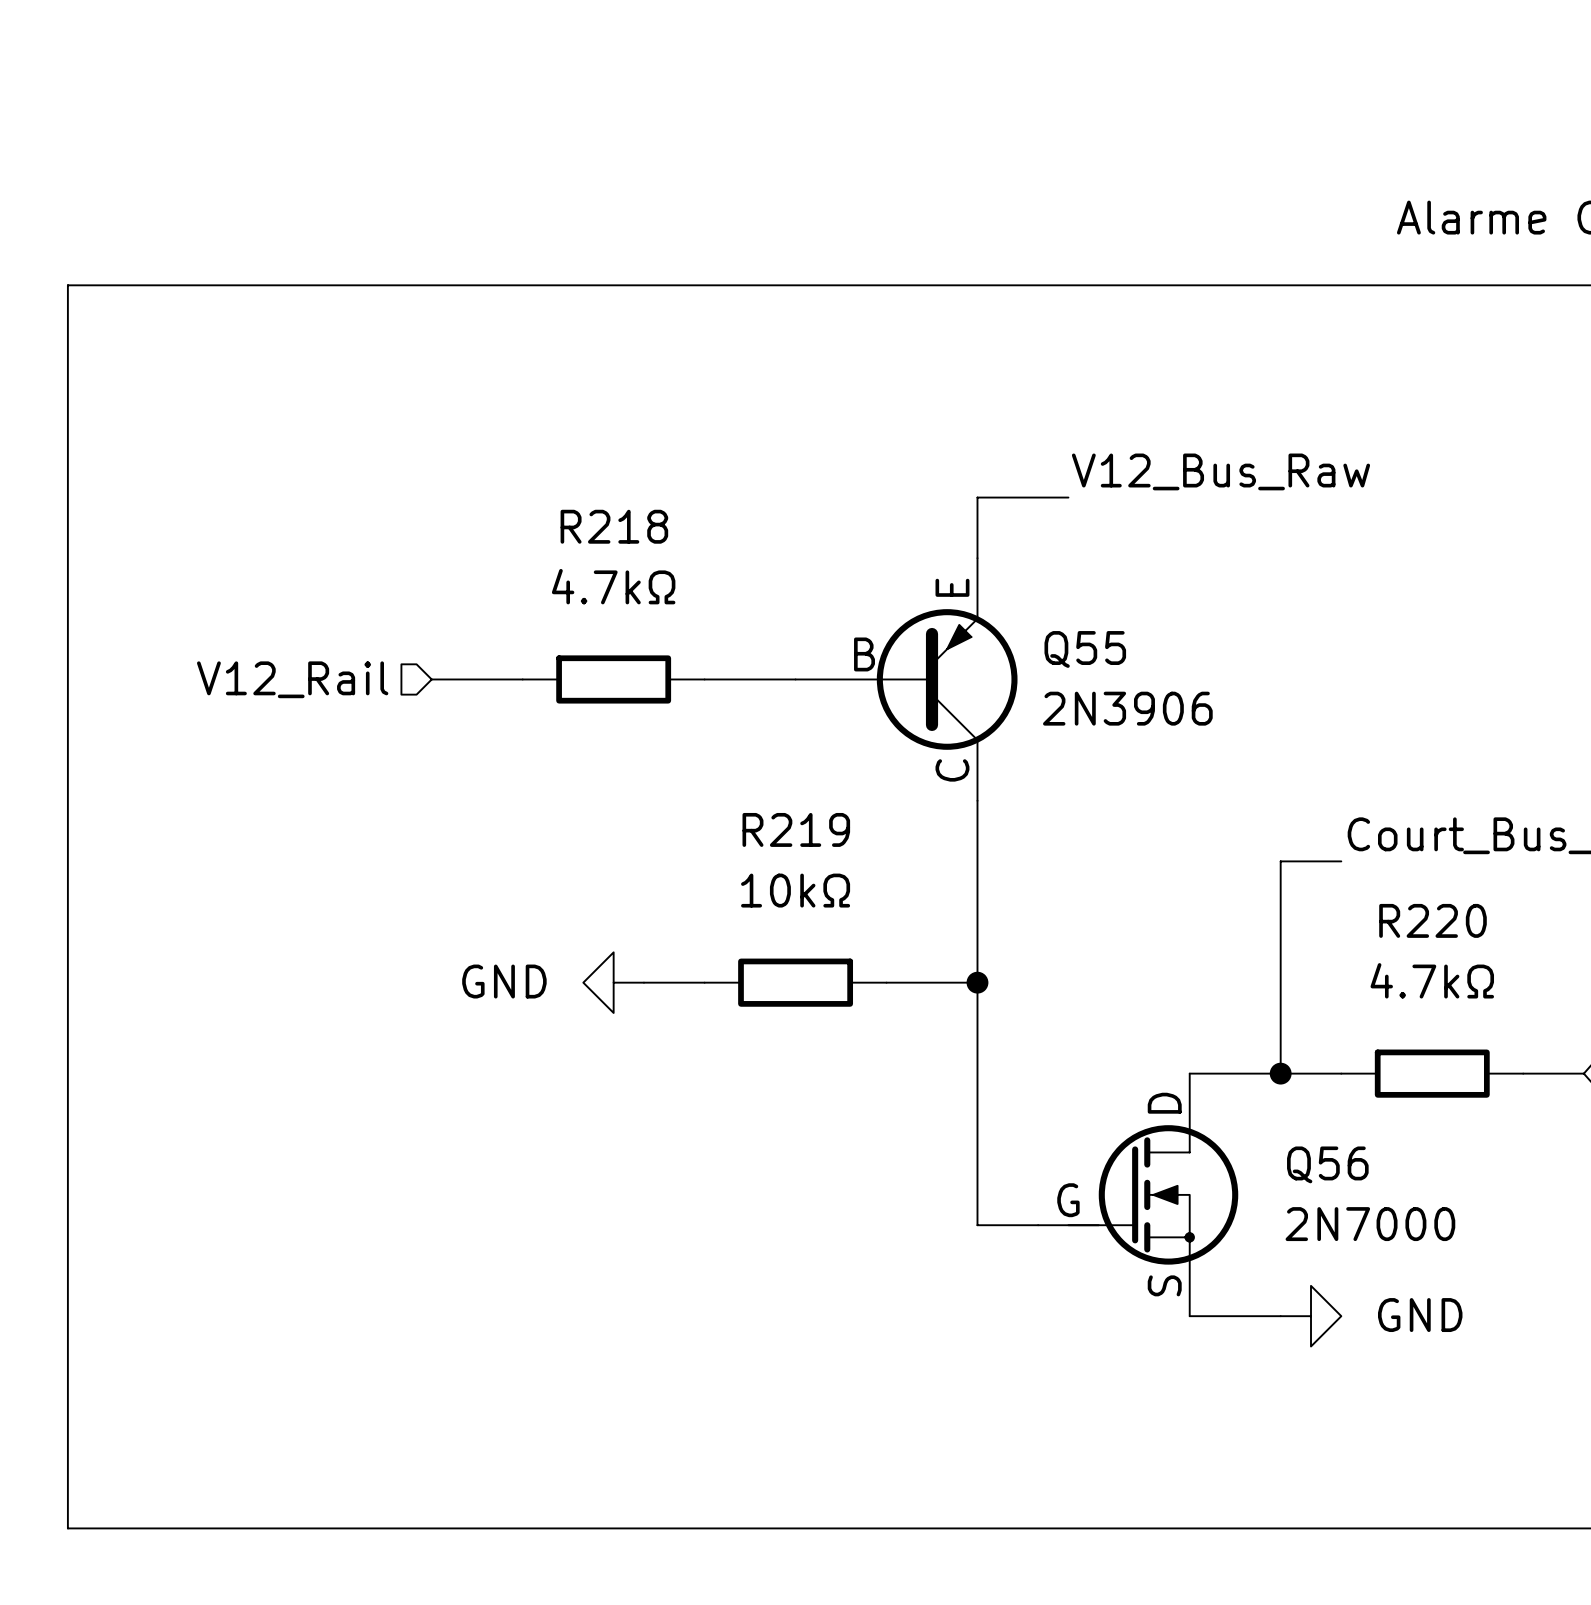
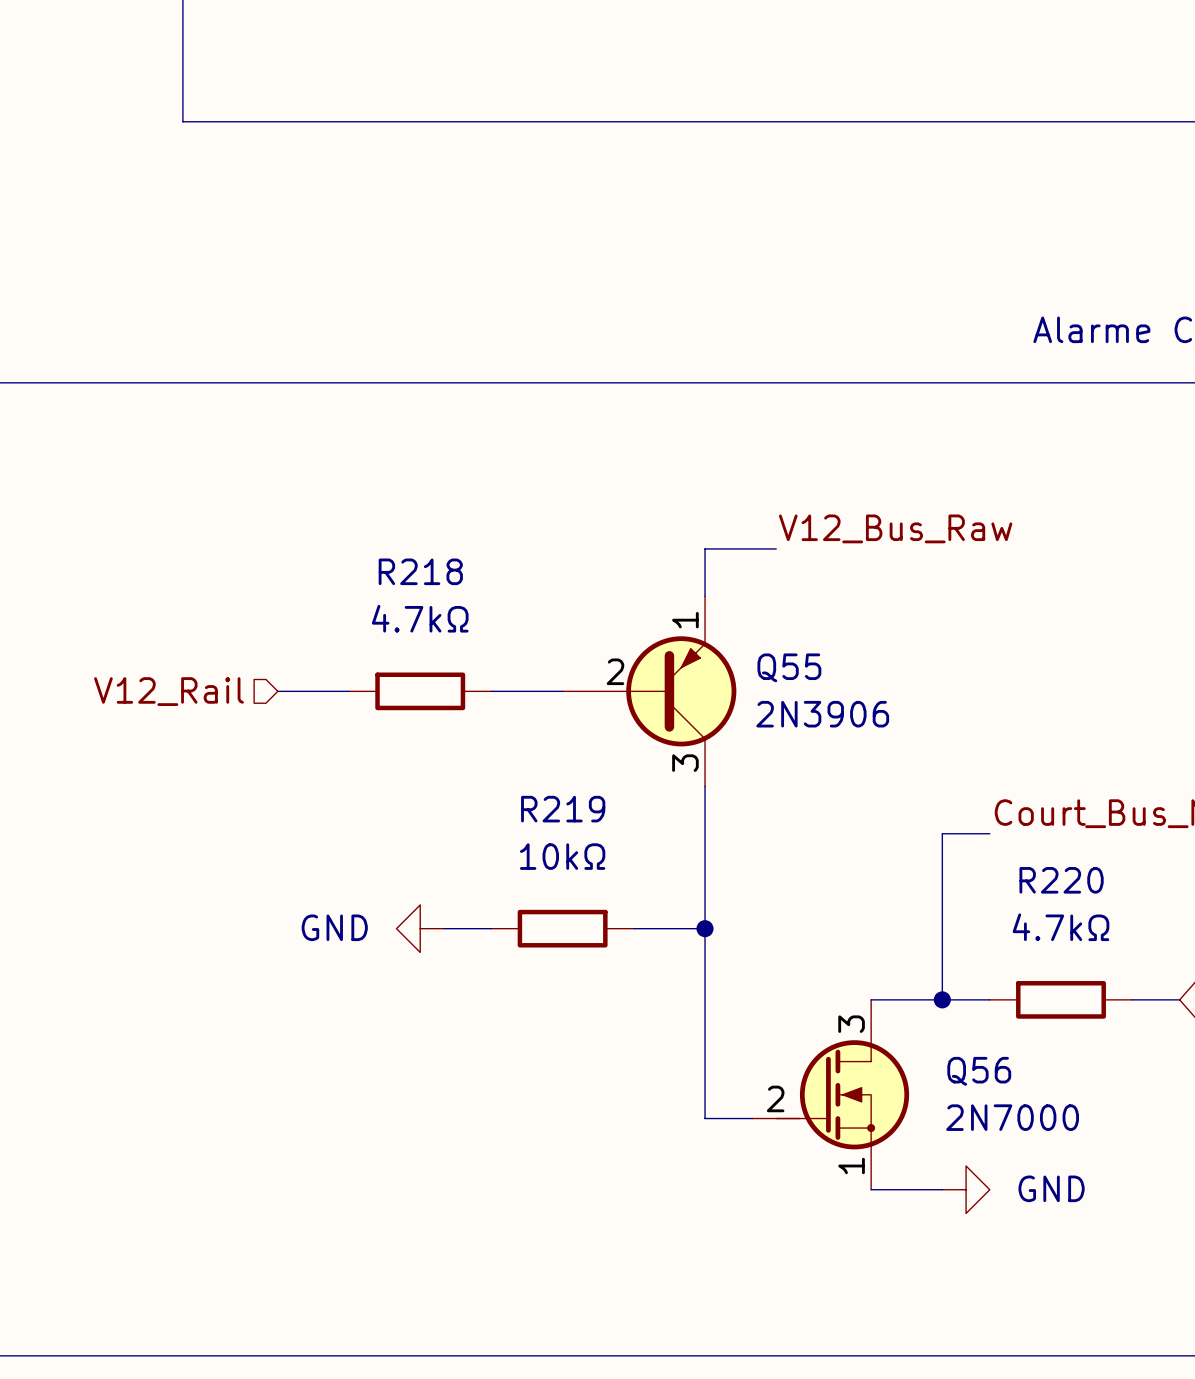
Q55 pin name: E (952, 587) -> none
Q55 pin number: none -> 1 (685, 620)
Q55 pin number: none -> 2 (615, 671)
Q55 pin name: B (864, 654) -> none
Q55 pin name: C (952, 770) -> none
Q55 pin number: none -> 3 (685, 763)
Q56 pin name: D (1164, 1103) -> none
Q56 pin number: none -> 3 (851, 1024)
Q56 pin number: none -> 2 (775, 1098)
Q56 pin name: G (1068, 1200) -> none
Q56 pin name: S (1164, 1285) -> none
Q56 pin number: none -> 1 (851, 1165)

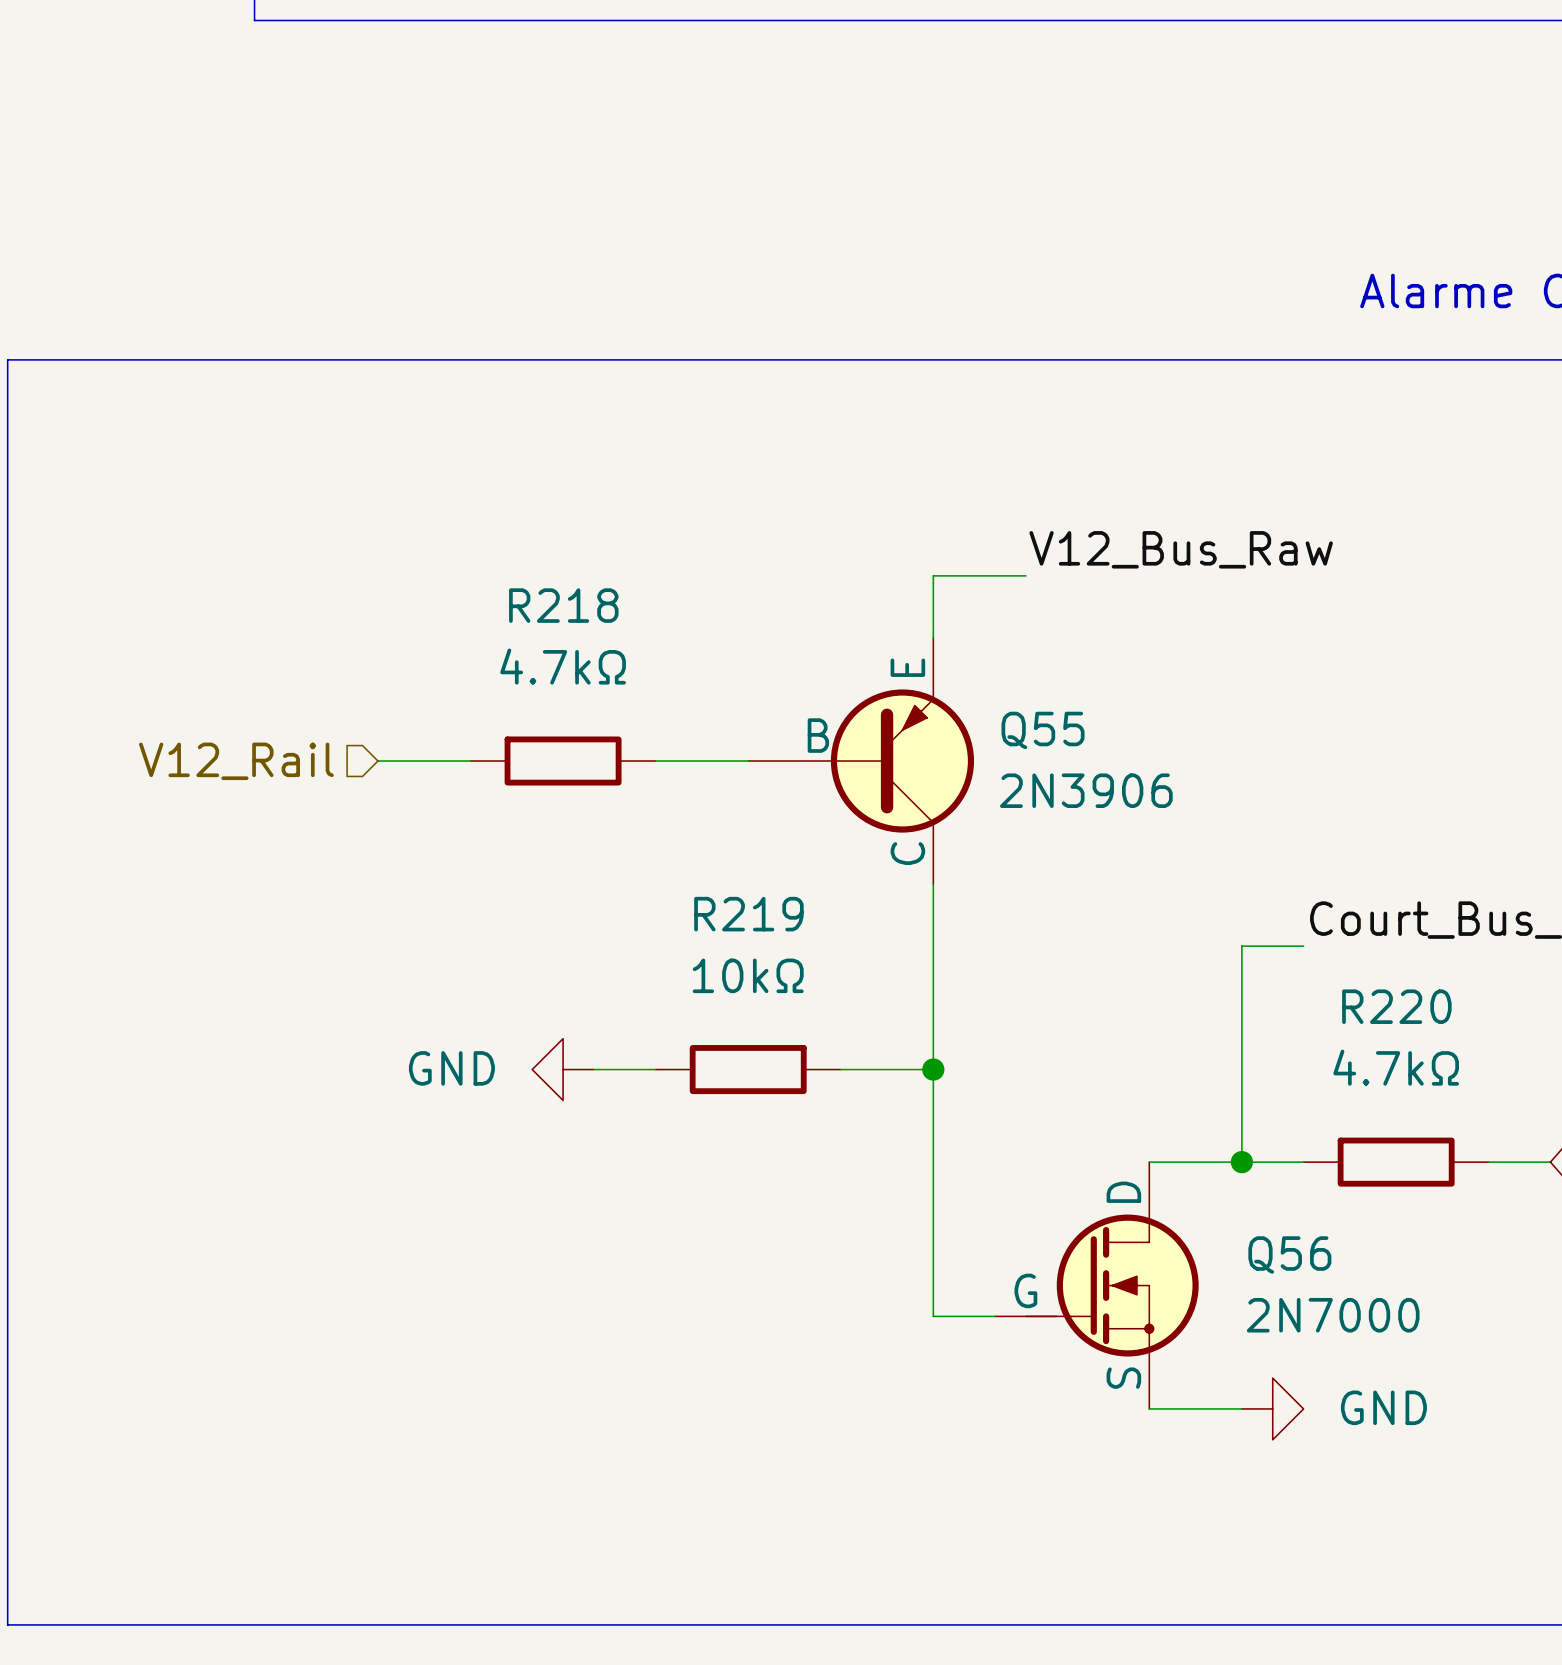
Q55 pin name: none -> E (907, 667)
Q55 pin number: 1 (685, 620) -> none
Q55 pin number: 2 (615, 671) -> none
Q55 pin name: none -> B (818, 735)
Q55 pin name: none -> C (907, 853)
Q55 pin number: 3 (685, 763) -> none
Q56 pin name: none -> D (1123, 1192)
Q56 pin number: 3 (851, 1024) -> none
Q56 pin number: 2 (775, 1098) -> none
Q56 pin name: none -> G (1025, 1290)
Q56 pin name: none -> S (1123, 1378)
Q56 pin number: 1 (851, 1165) -> none

